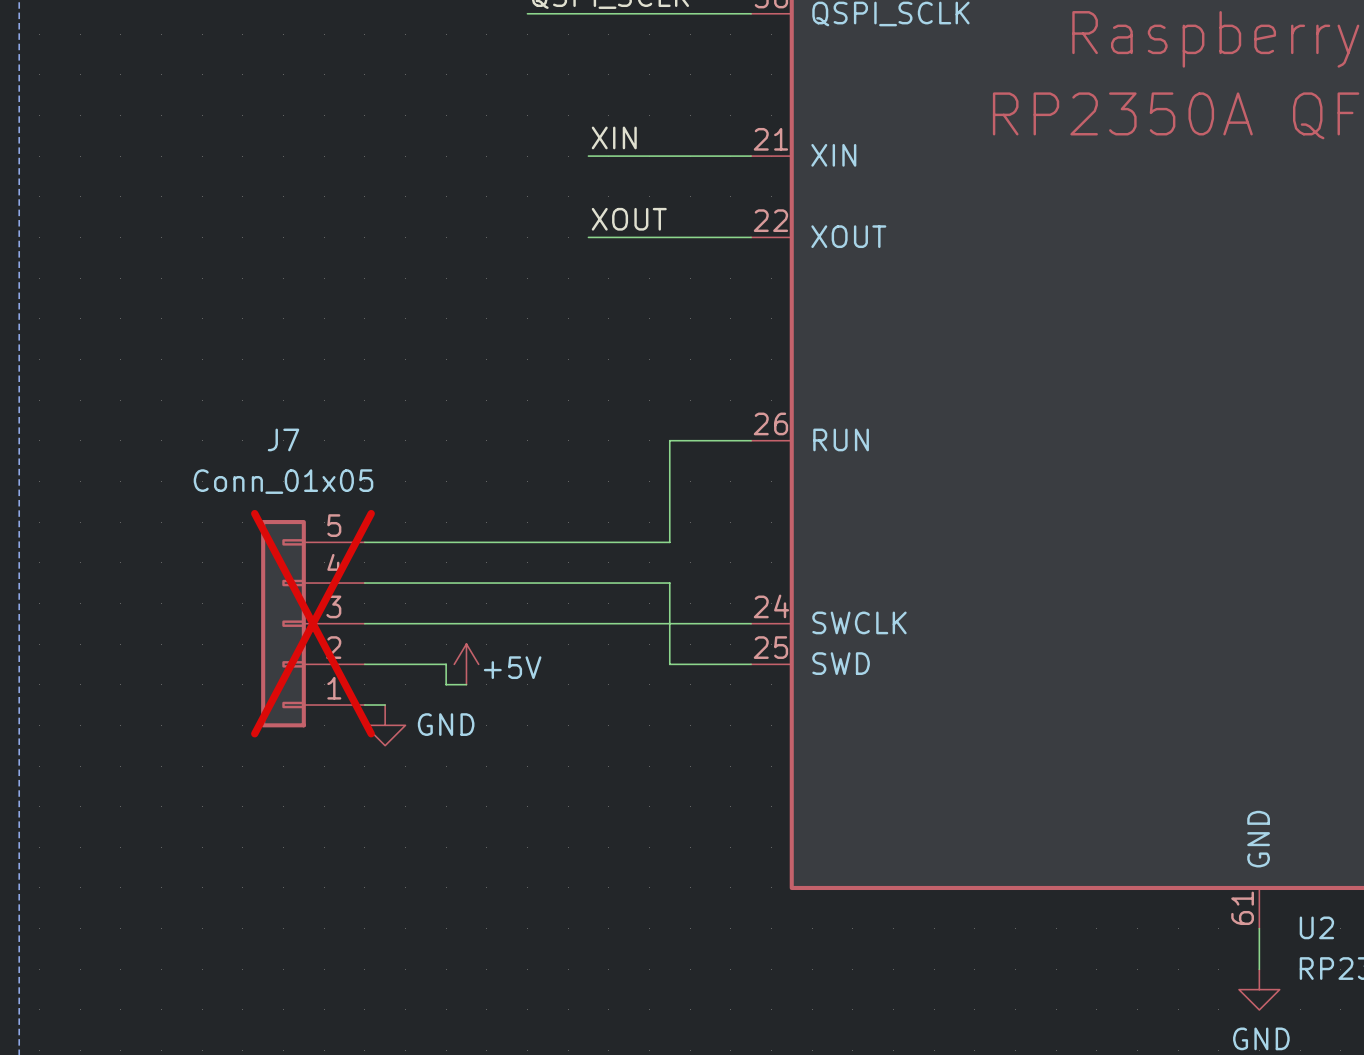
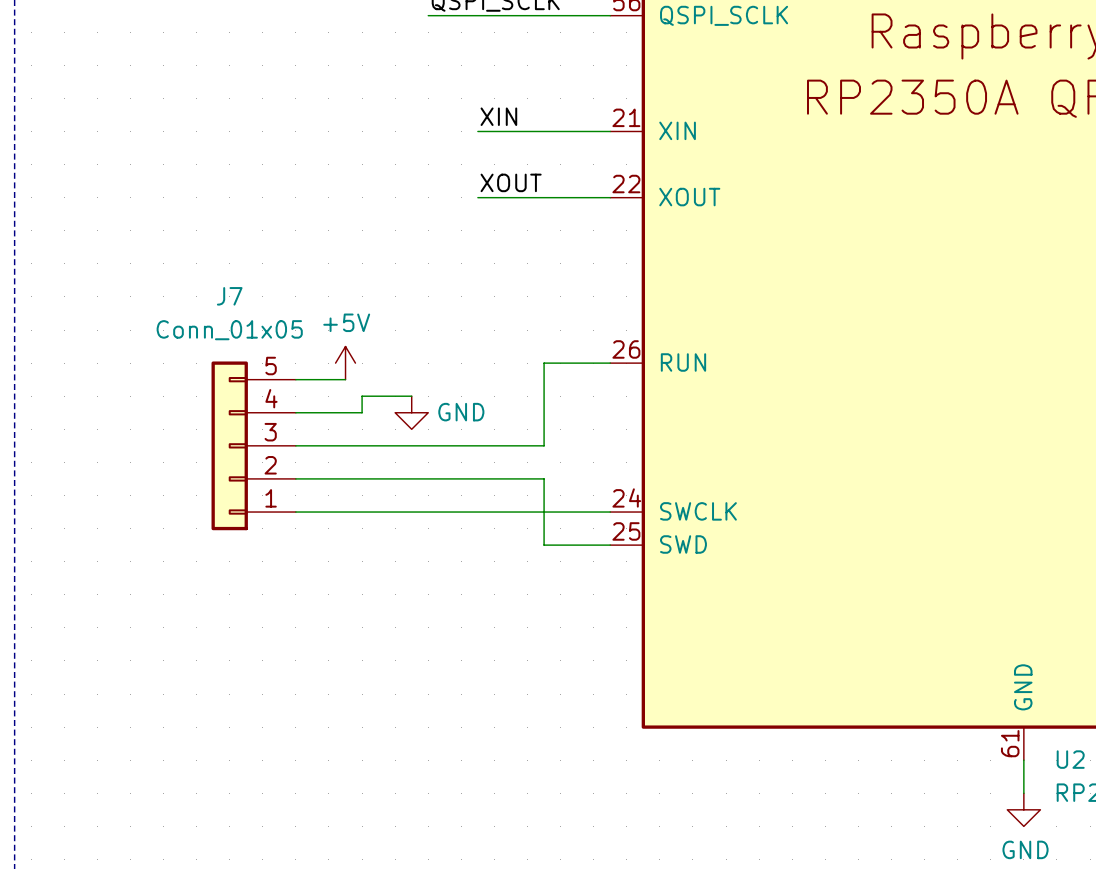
wire: none -> (295, 379) (345, 379)
wire: none -> (411, 396) (362, 396) (362, 412) (295, 412)
J7 position: (312, 623) -> (253, 445)
J7 do-not-place cross: (312, 623) -> none
wire: (364, 664) (446, 664) (446, 684) (466, 684) -> none
power symbol position: +5V (466, 664) -> +5V (345, 363)
power symbol text position: +5V (512, 667) -> +5V (346, 322)
wire: (364, 705) (385, 705) -> none
power symbol position: GND (385, 725) -> GND (411, 412)

